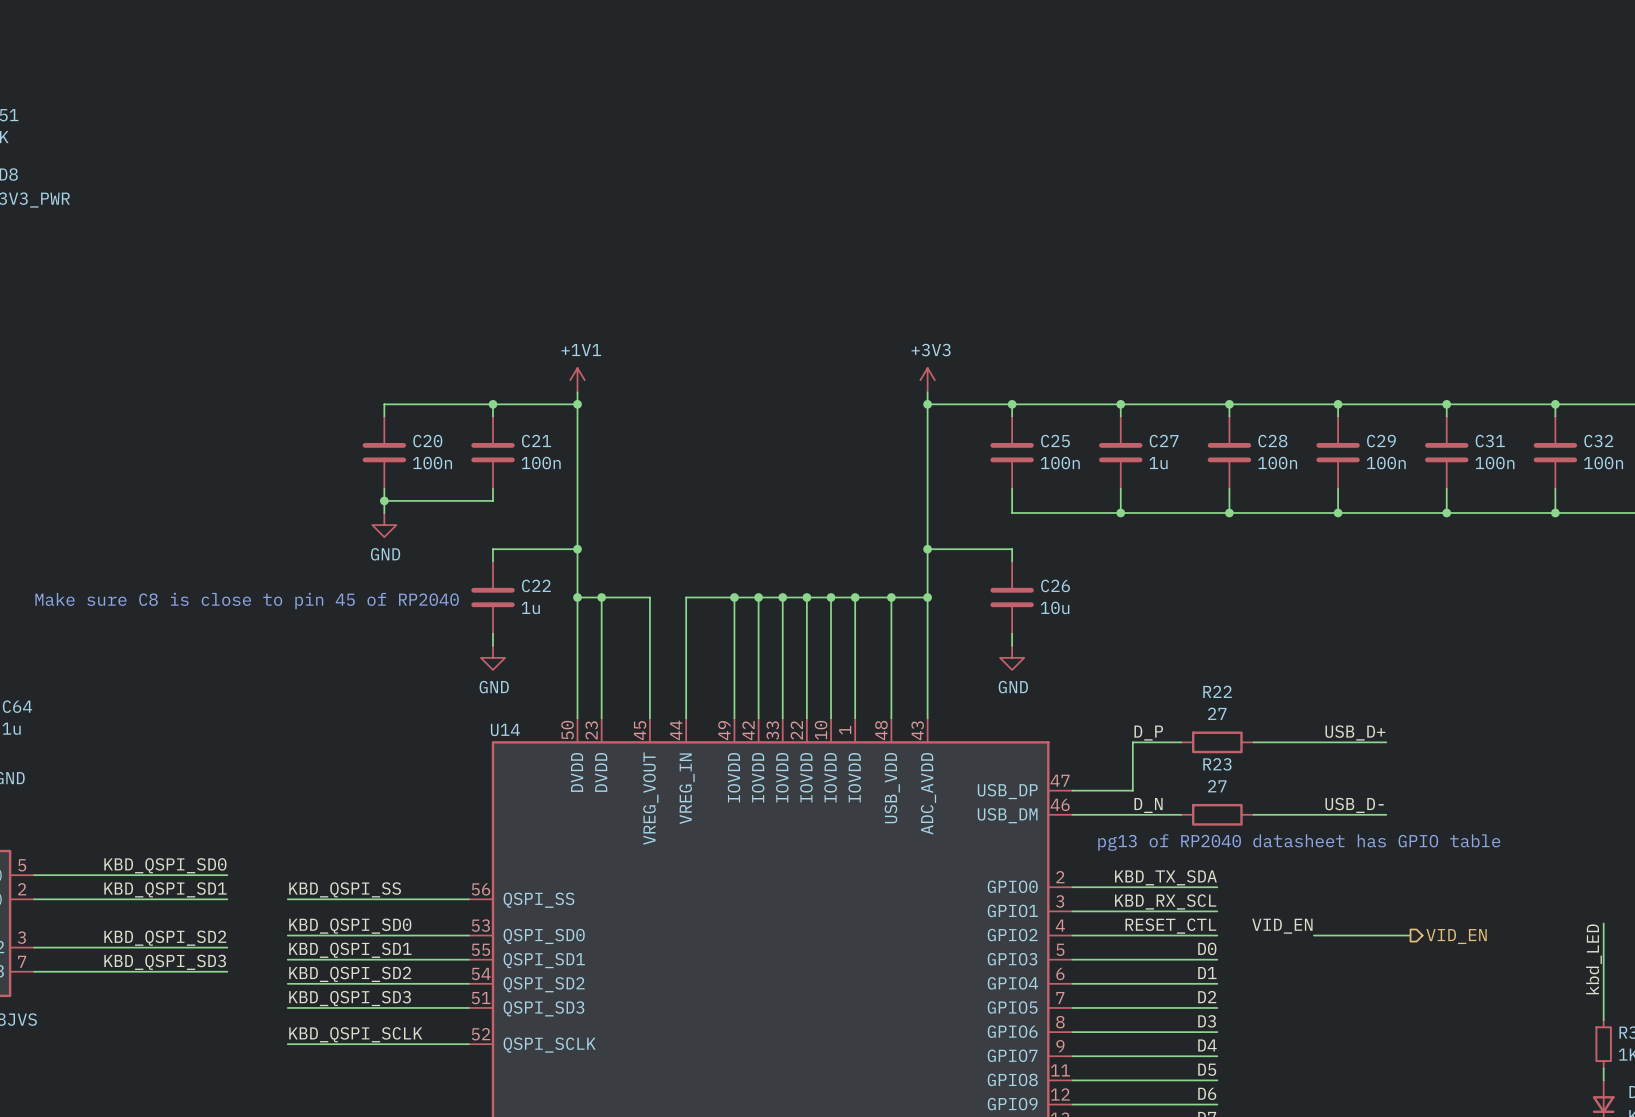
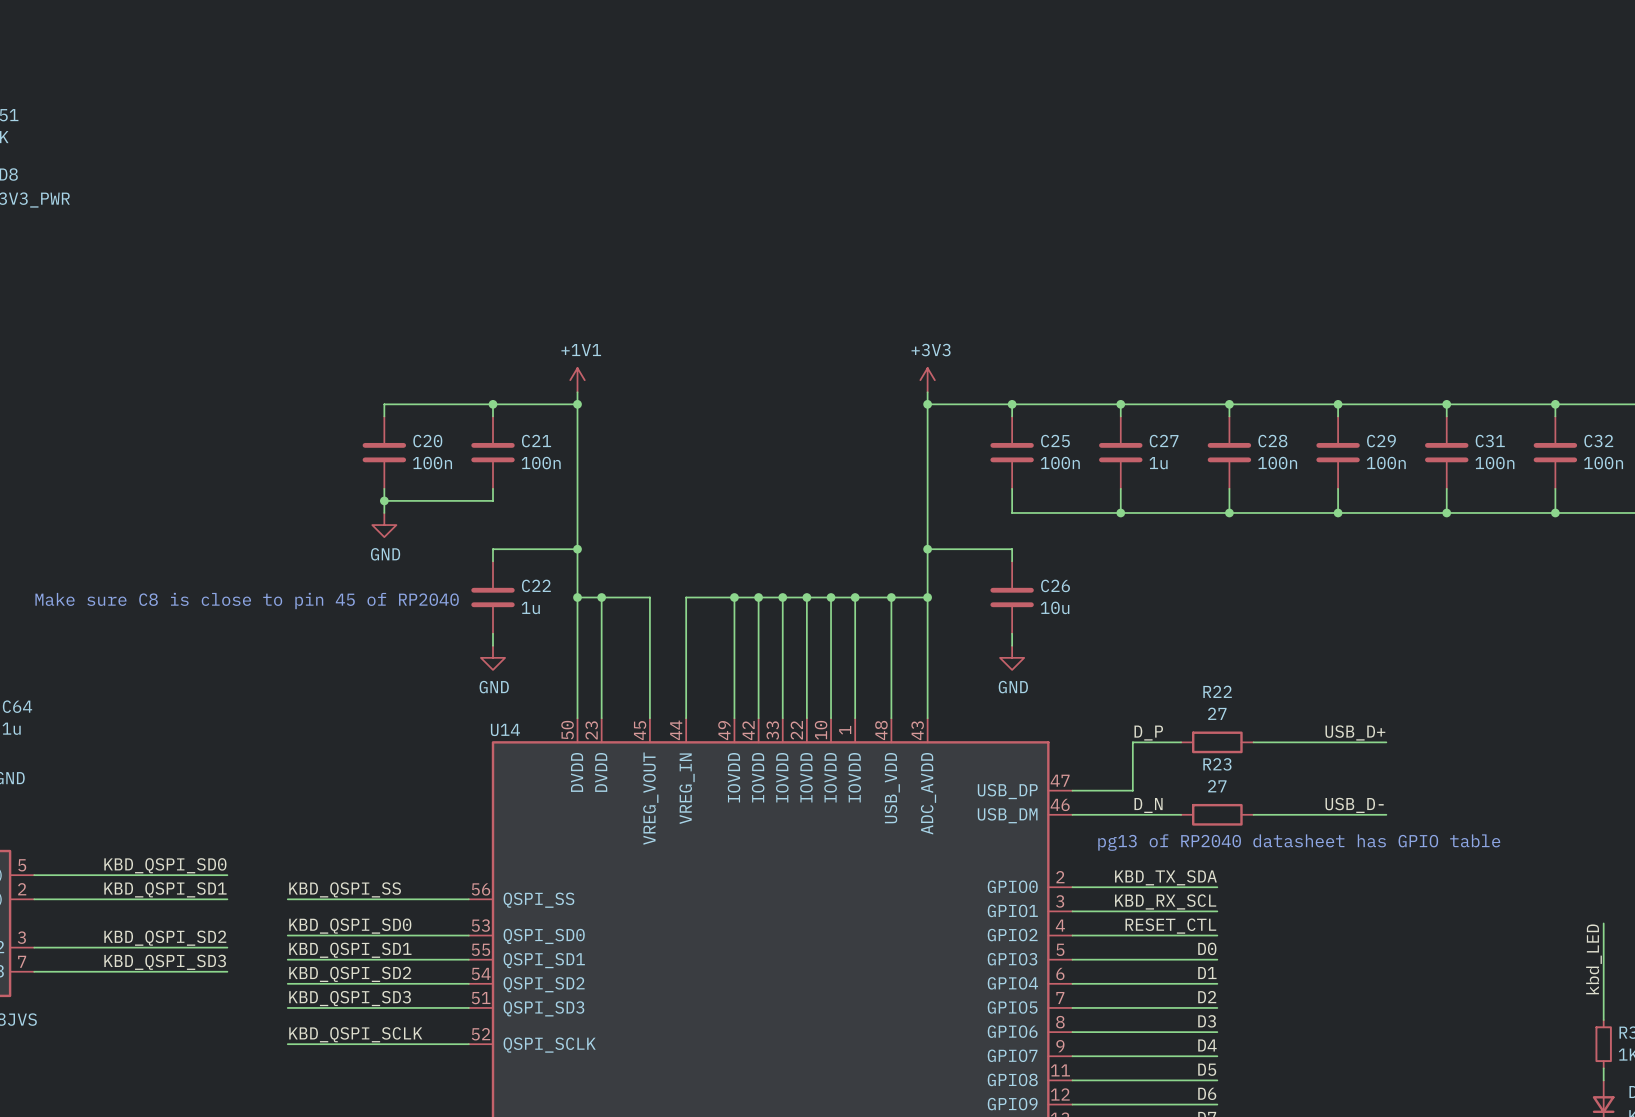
label: VID_EN (1282, 926) -> none
wire: (1313, 935) (1410, 935) -> none
hierarchical label: VID_EN (1456, 936) -> none

